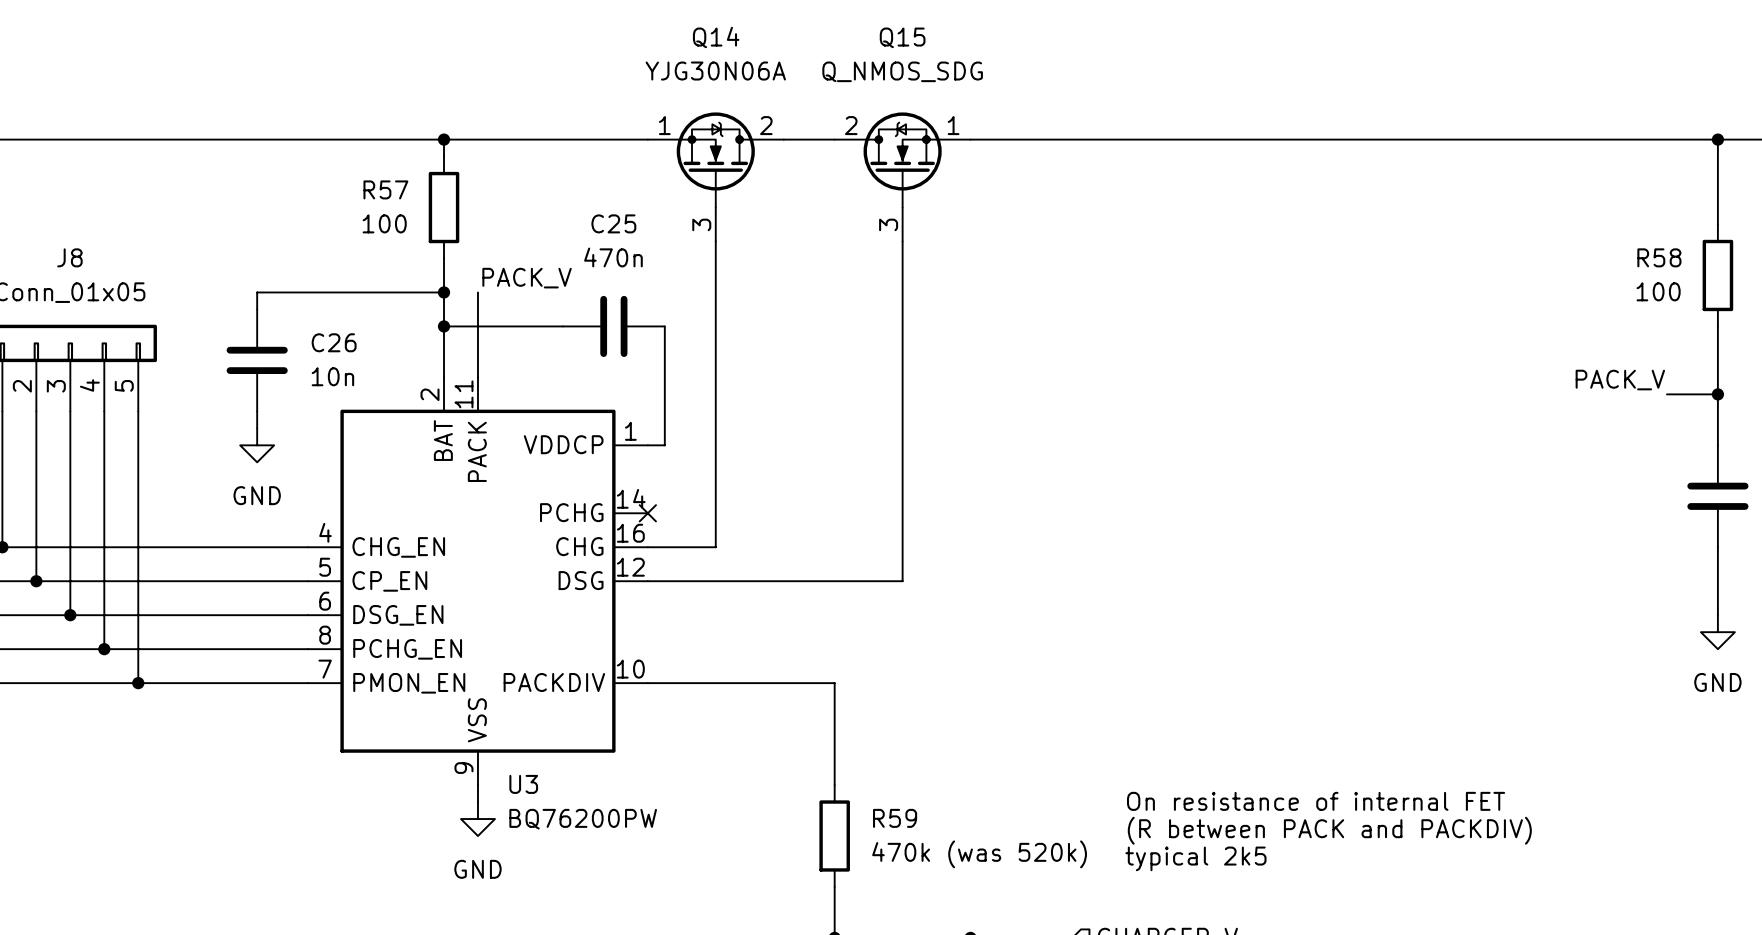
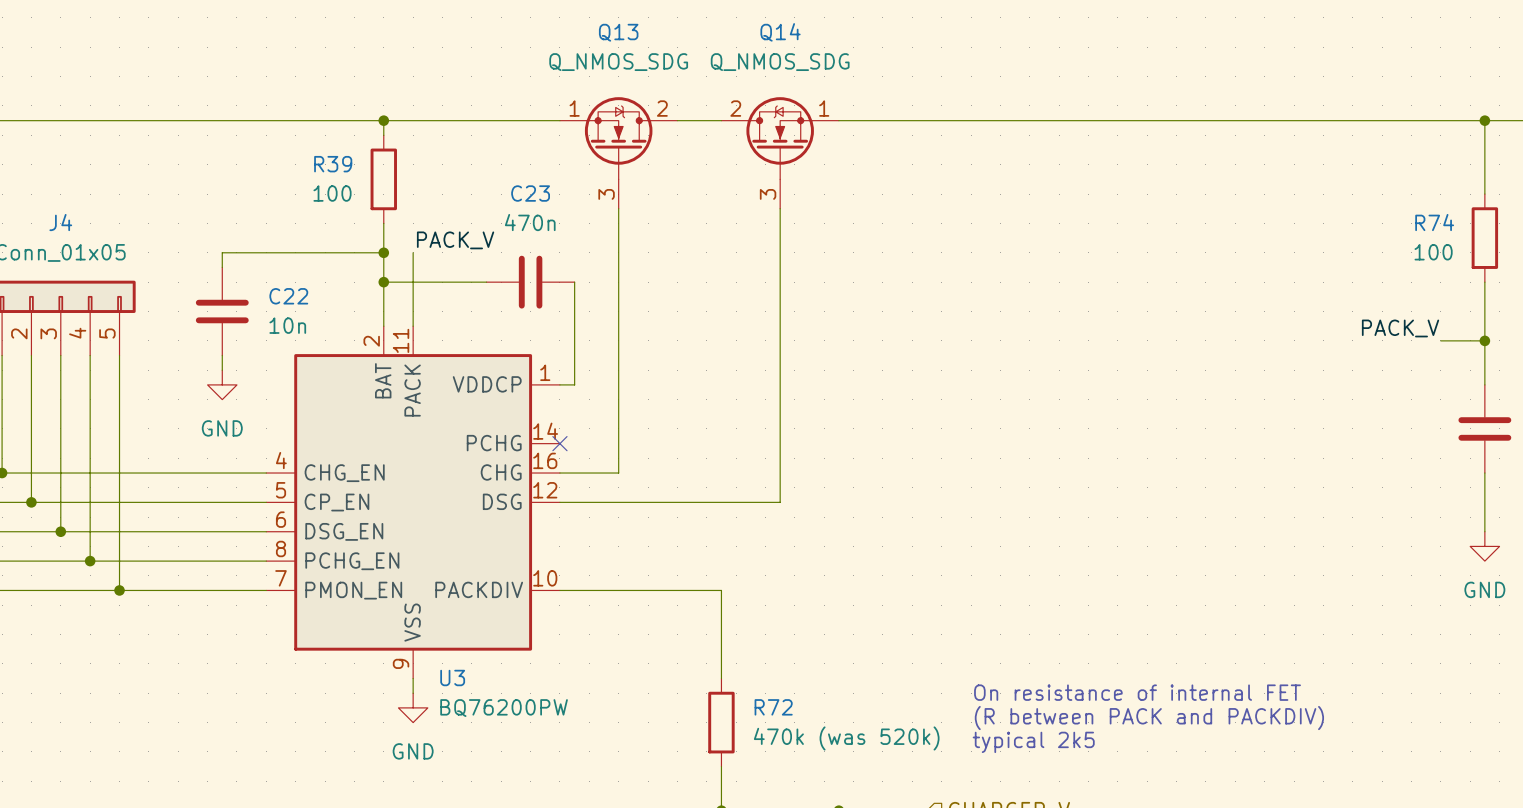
Q14 name: Q14 (716, 37) -> Q13 (618, 32)
Q15 name: Q15 (902, 37) -> Q14 (780, 32)
Q14 value: YJG30N06A (715, 71) -> Q_NMOS_SDG (618, 62)
R57 name: R57 (385, 189) -> R39 (333, 164)
C25 name: C25 (613, 223) -> C23 (530, 193)
J8 name: J8 (69, 257) -> J4 (60, 222)
R58 name: R58 (1659, 257) -> R74 (1434, 222)
C26 name: C26 (334, 342) -> C22 (288, 296)
R59 name: R59 (895, 818) -> R72 (773, 707)

